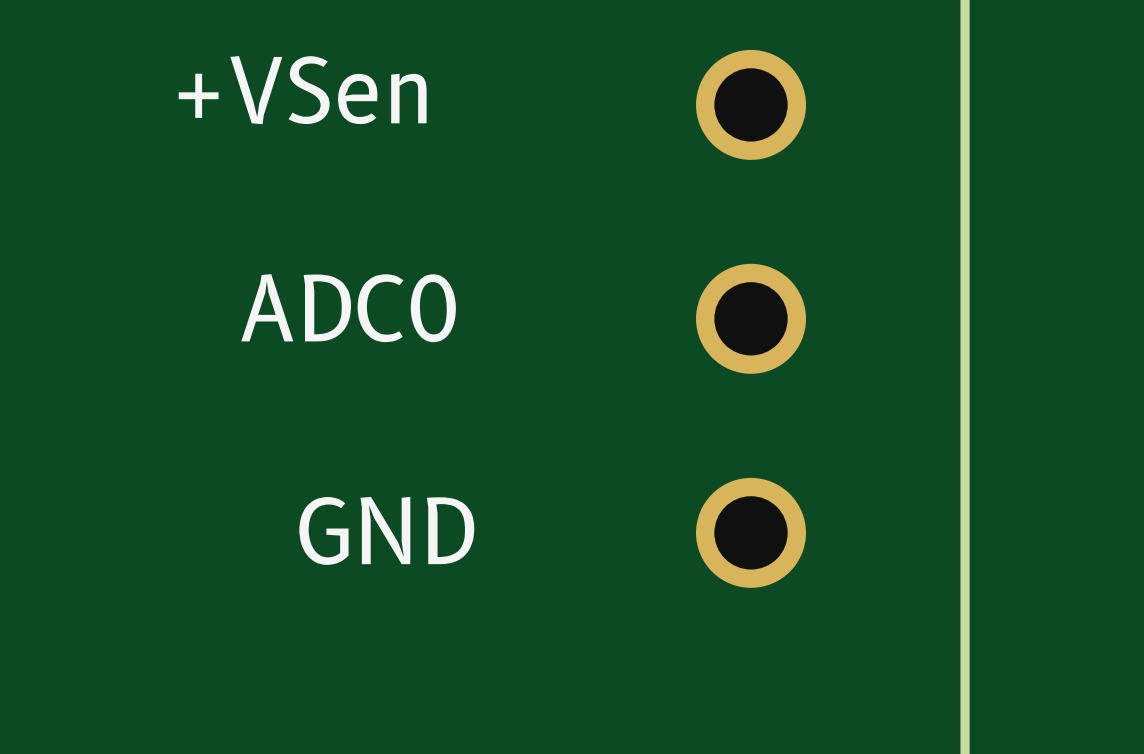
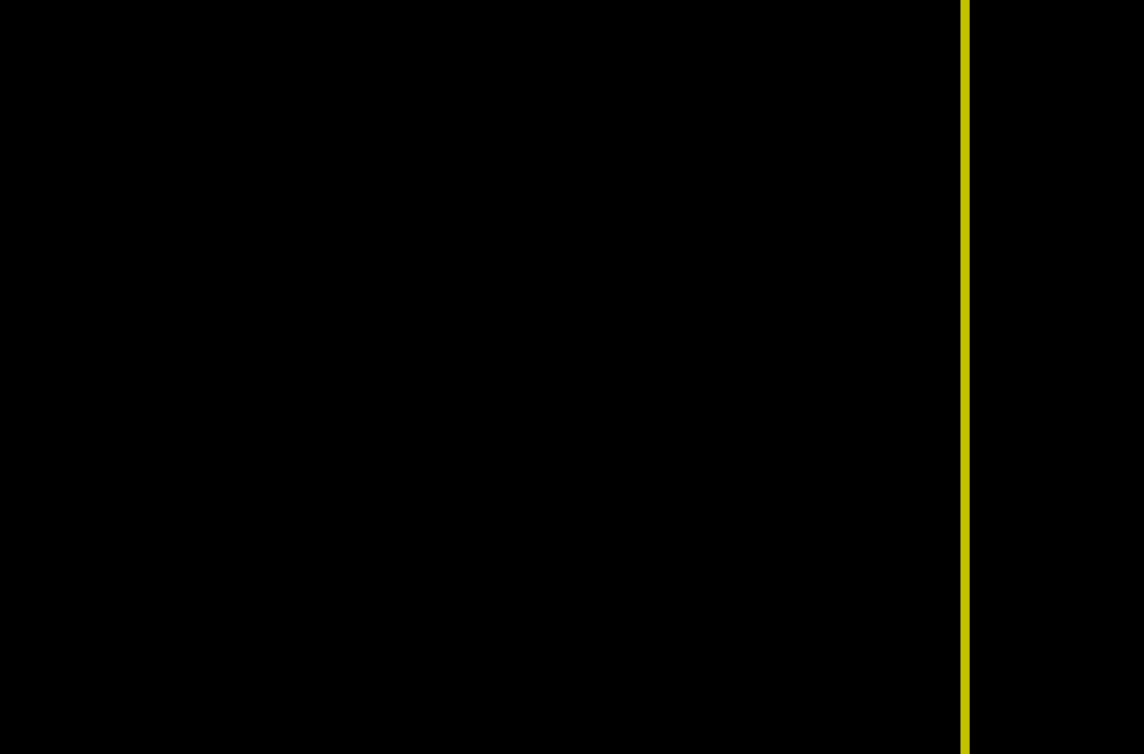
text: +VSen (302, 90) -> none
text: ADC0 (348, 308) -> none
part: (751, 318) -> none
text: GND (386, 530) -> none

